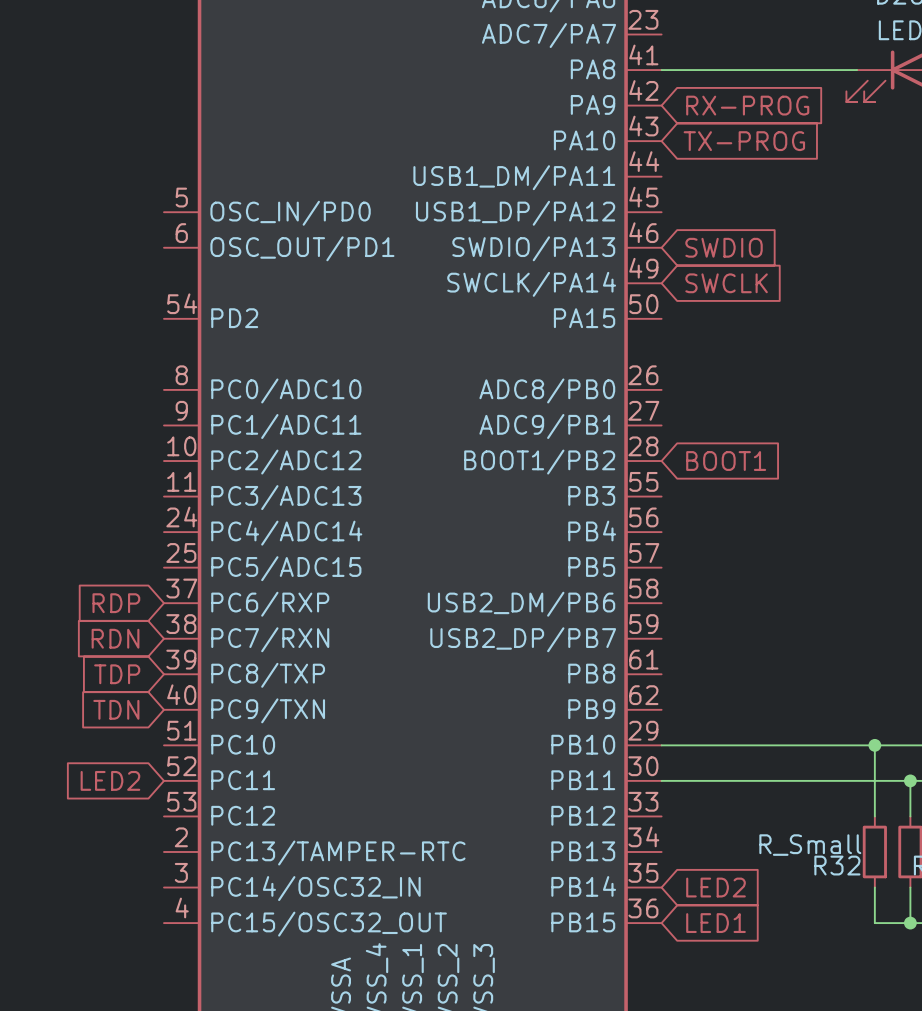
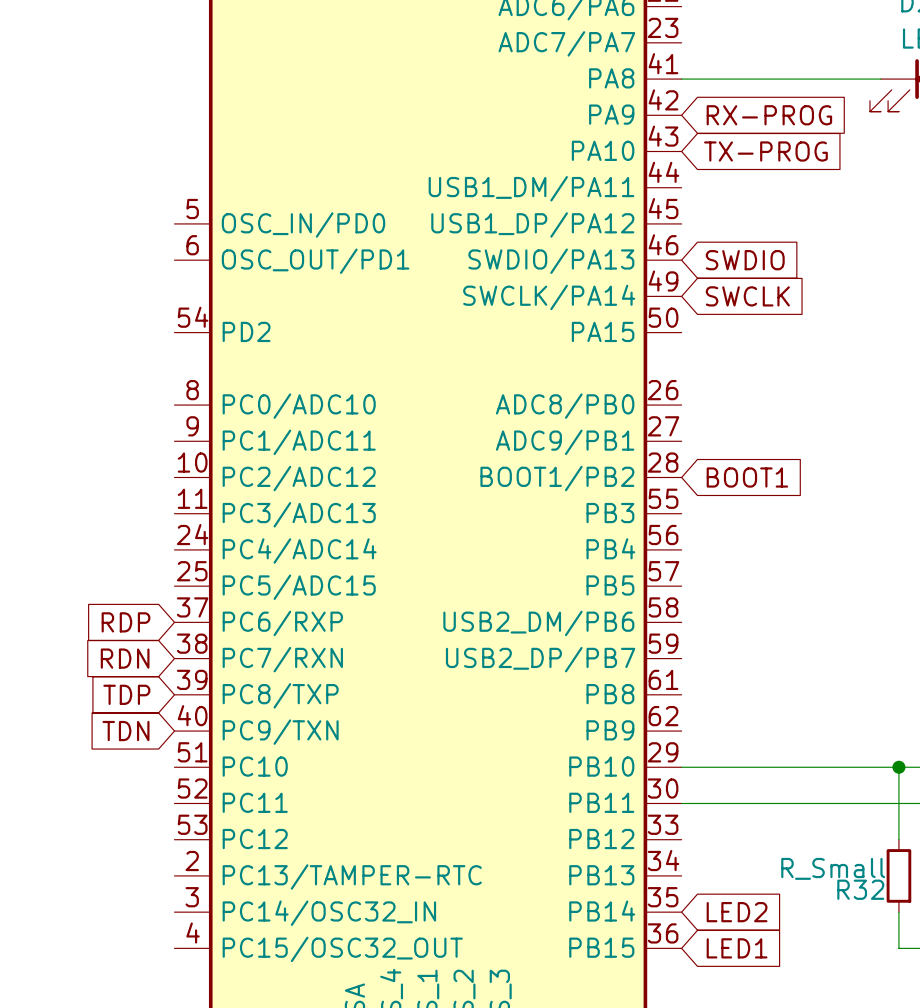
global label: LED2 (110, 780) -> none

